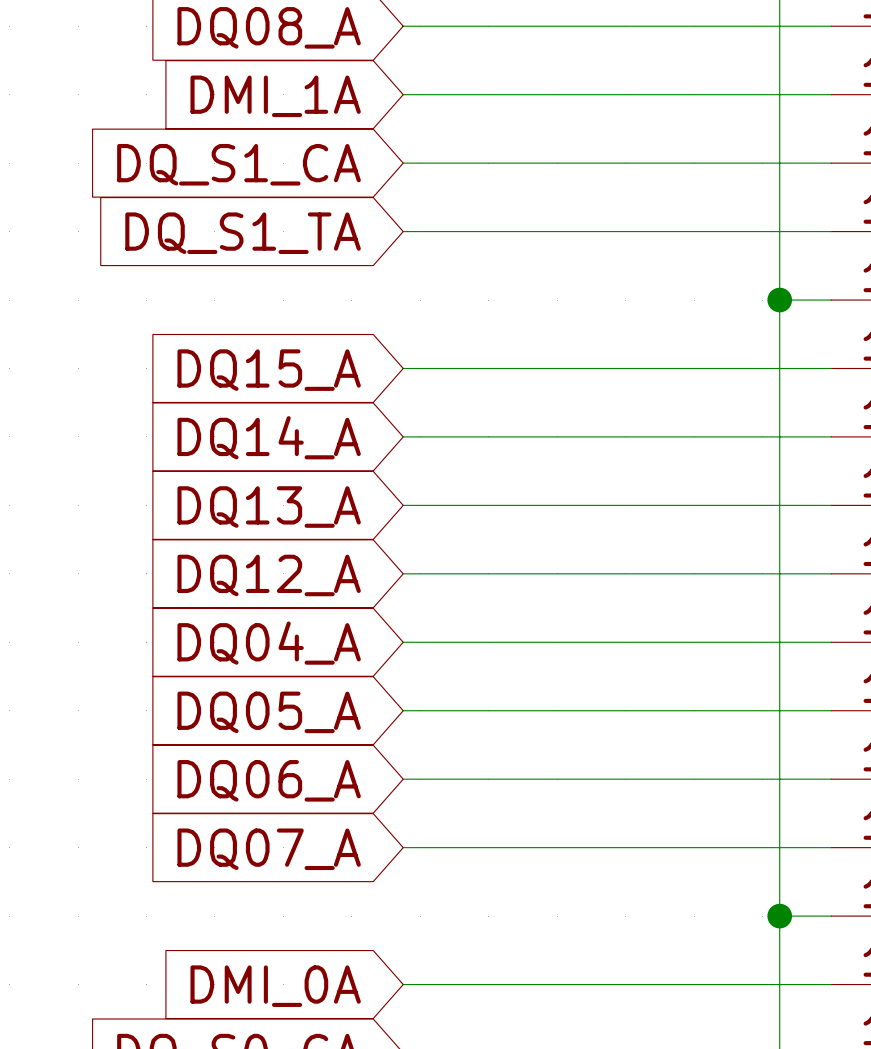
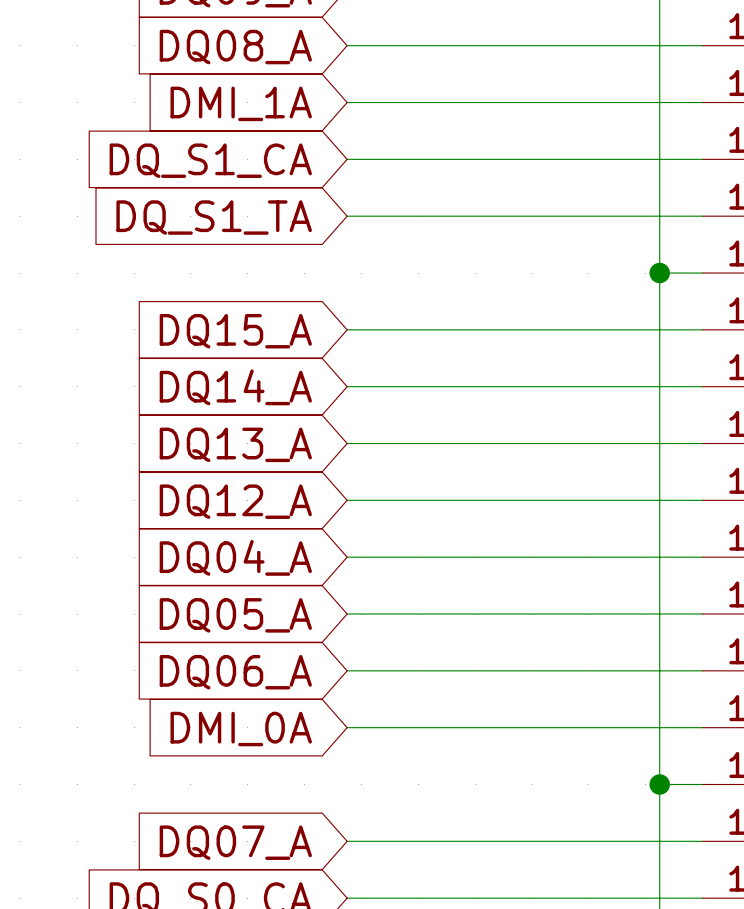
global label: DQ07_A (269, 849) -> DMI_0A (241, 729)
global label: DMI_0A (275, 986) -> DQ07_A (235, 842)

